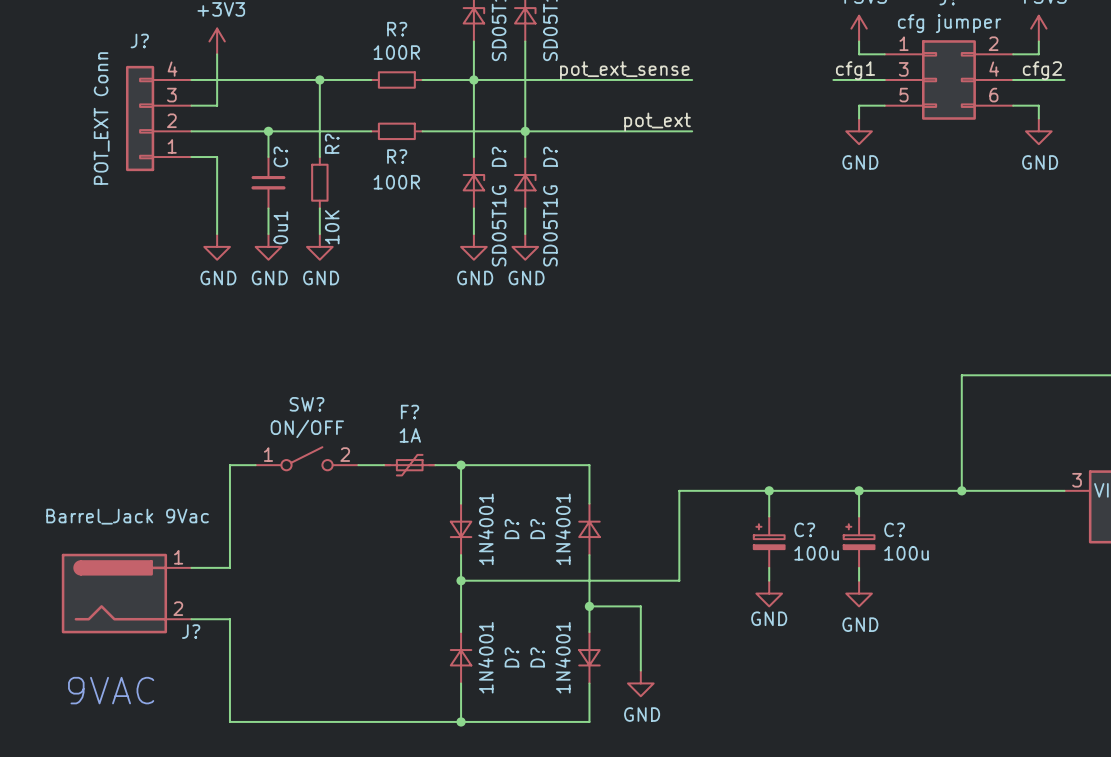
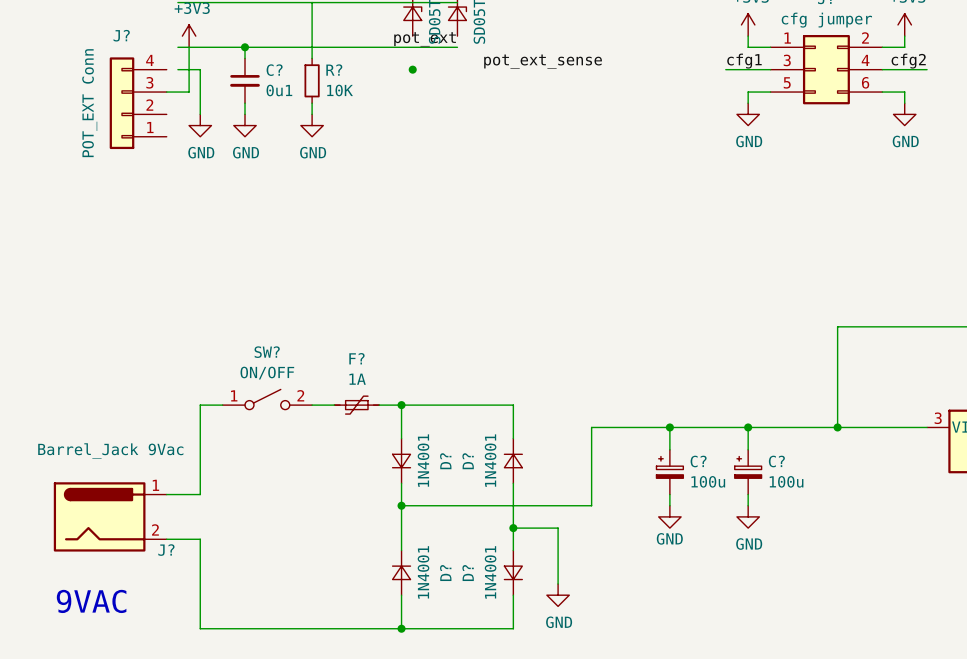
wire: none -> (177, 2) (457, 2)
wire: none -> (312, 2) (312, 58)
wire: (473, 41) (473, 157) -> none
wire: (525, 41) (525, 157) -> none
wire: none -> (177, 47) (457, 47)
wire: none -> (245, 47) (245, 58)
junction: none -> (245, 47)
wire: (191, 79) (204, 79) -> none
wire: (229, 79) (371, 79) -> (200, 69) (200, 114)
wire: (319, 79) (319, 157) -> none
junction: (319, 79) -> none
R?: 100R (396, 79) -> none
wire: (422, 79) (692, 79) -> none
wire: none -> (245, 103) (245, 114)
wire: none -> (312, 103) (312, 114)
label position: pot_ext (657, 122) -> pot_ext (425, 39)
wire: (191, 131) (371, 131) -> none
wire: (268, 131) (268, 157) -> none
junction: (268, 131) -> none
R?: 100R (396, 131) -> none
wire: (422, 131) (692, 131) -> none
junction: (525, 131) -> none
R? name rotation: 0° (332, 143) -> 90° clockwise (334, 70)
R? name position: R? (332, 143) -> R? (334, 70)
power symbol: none -> GND (200, 125)
power symbol: none -> GND (245, 125)
power symbol: none -> GND (312, 125)
C? name rotation: 0° (280, 156) -> 90° clockwise (274, 70)
C? name position: C? (280, 156) -> C? (274, 70)
wire: (191, 157) (217, 157) (217, 234) -> none
C? position: (268, 182) -> (245, 80)
R? position: (319, 182) -> (312, 80)
D?: SD05T1G (473, 182) -> none
D?: SD05T1G (525, 182) -> none
wire: (268, 208) (268, 234) -> none
wire: (319, 208) (319, 234) -> none
wire: (473, 208) (473, 234) -> none
wire: (525, 208) (525, 234) -> none
C? value rotation: 0° (280, 227) -> 90° clockwise (279, 90)
C? value position: 0u1 (280, 227) -> 0u1 (279, 90)
R? value rotation: 0° (332, 227) -> 90° clockwise (340, 90)
power symbol: GND (217, 246) -> none
power symbol: GND (268, 246) -> none
power symbol: GND (319, 246) -> none
power symbol: GND (473, 246) -> none
power symbol: GND (525, 246) -> none

